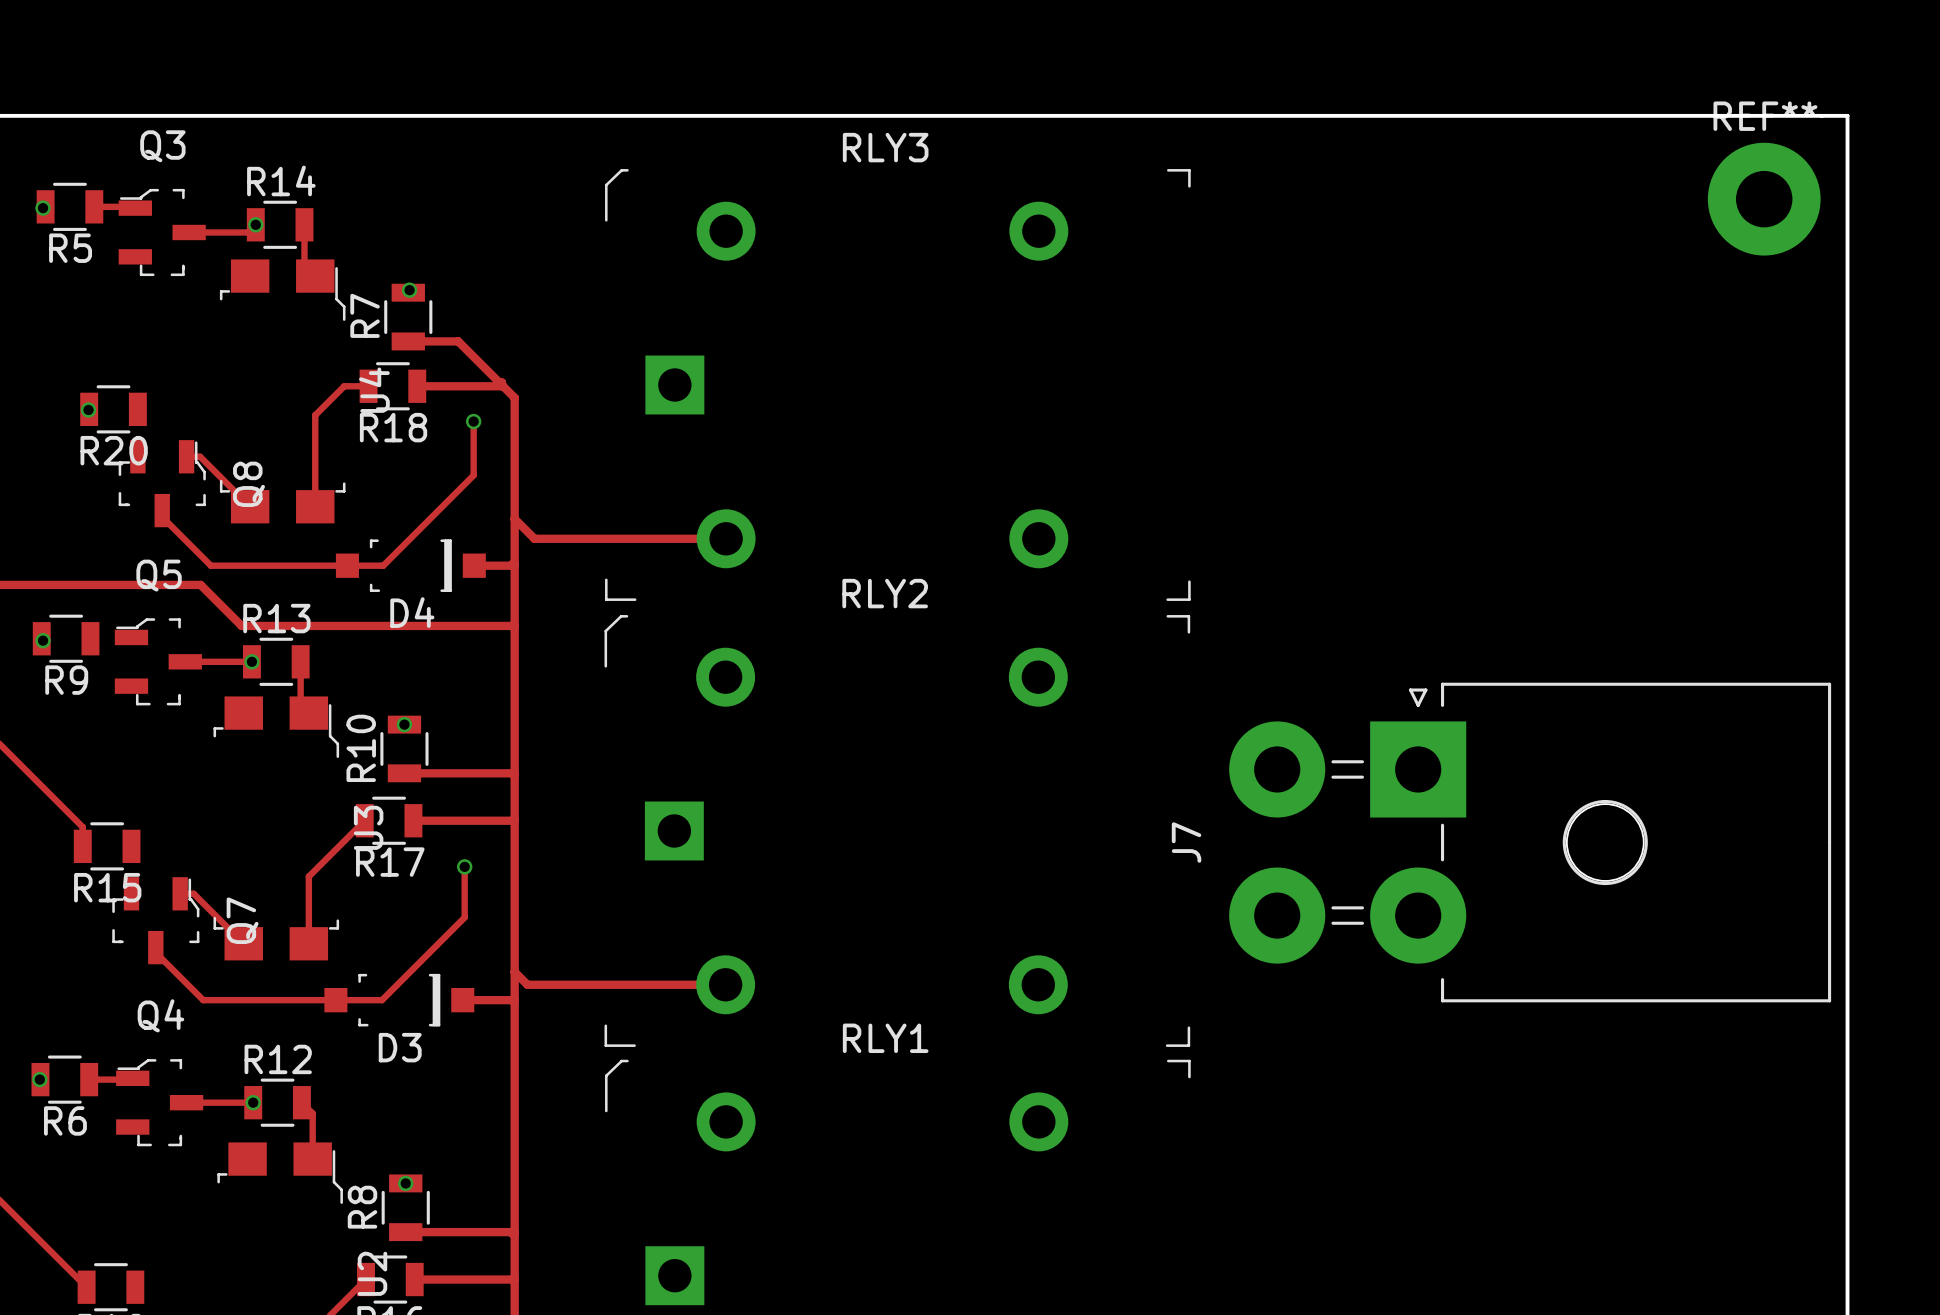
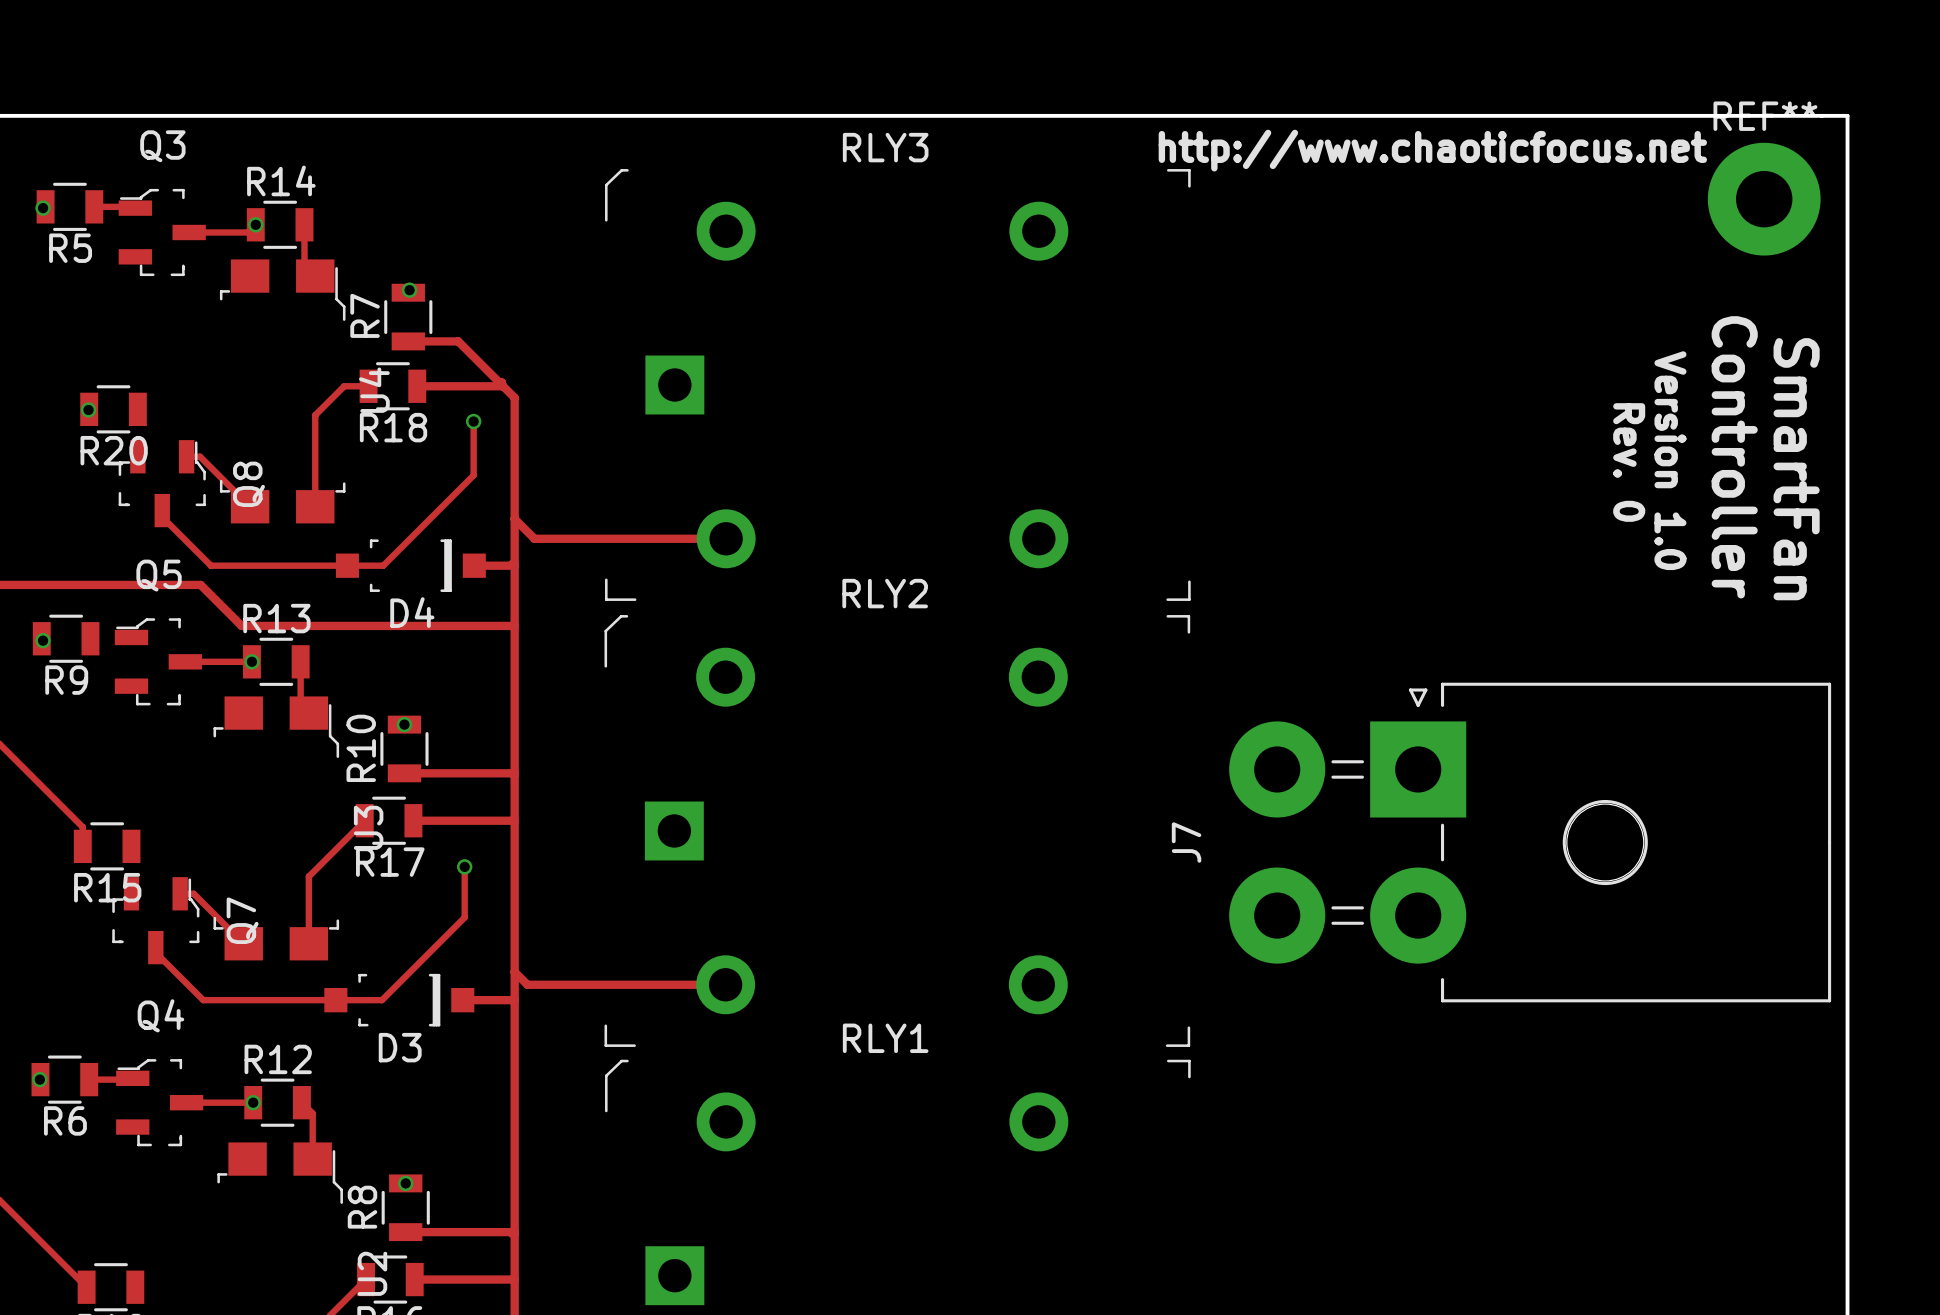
text: none -> http://www.chaoticfocus.net (1432, 150)
text: none -> Controller (1734, 457)
text: none -> Version 1.0 (1670, 460)
text: none -> Rev. 0 (1629, 462)
text: none -> SmartFan (1796, 469)

